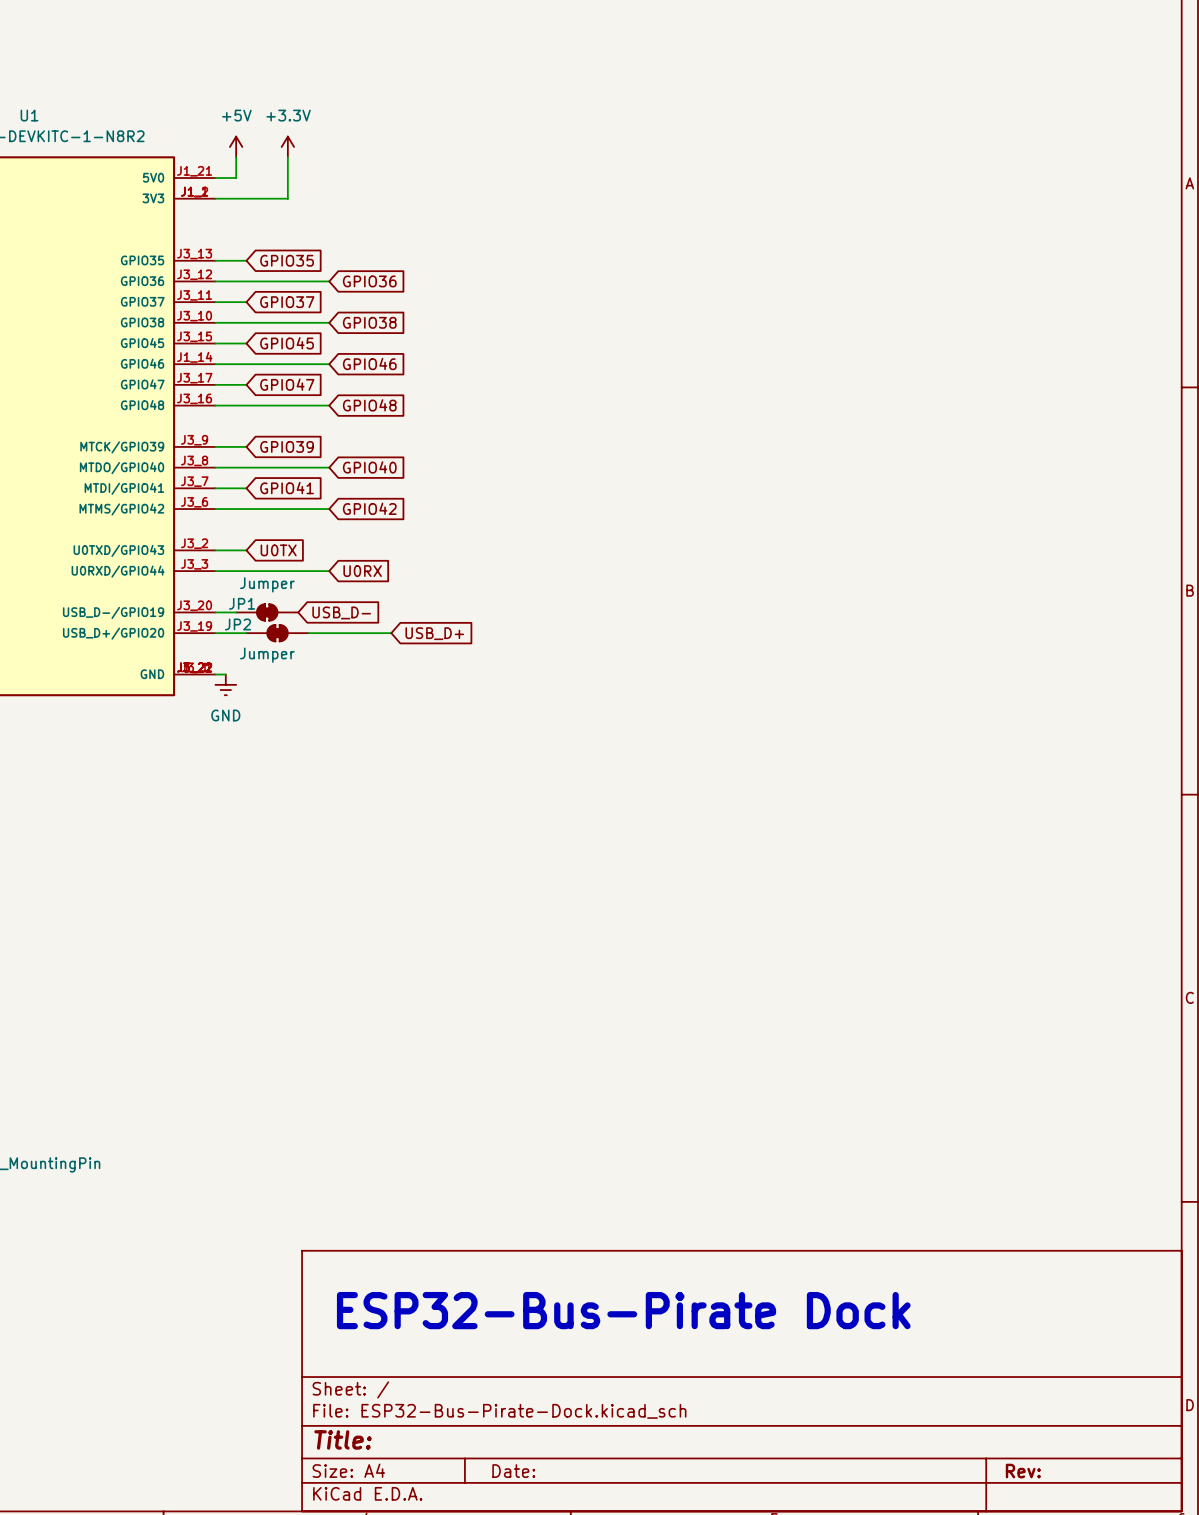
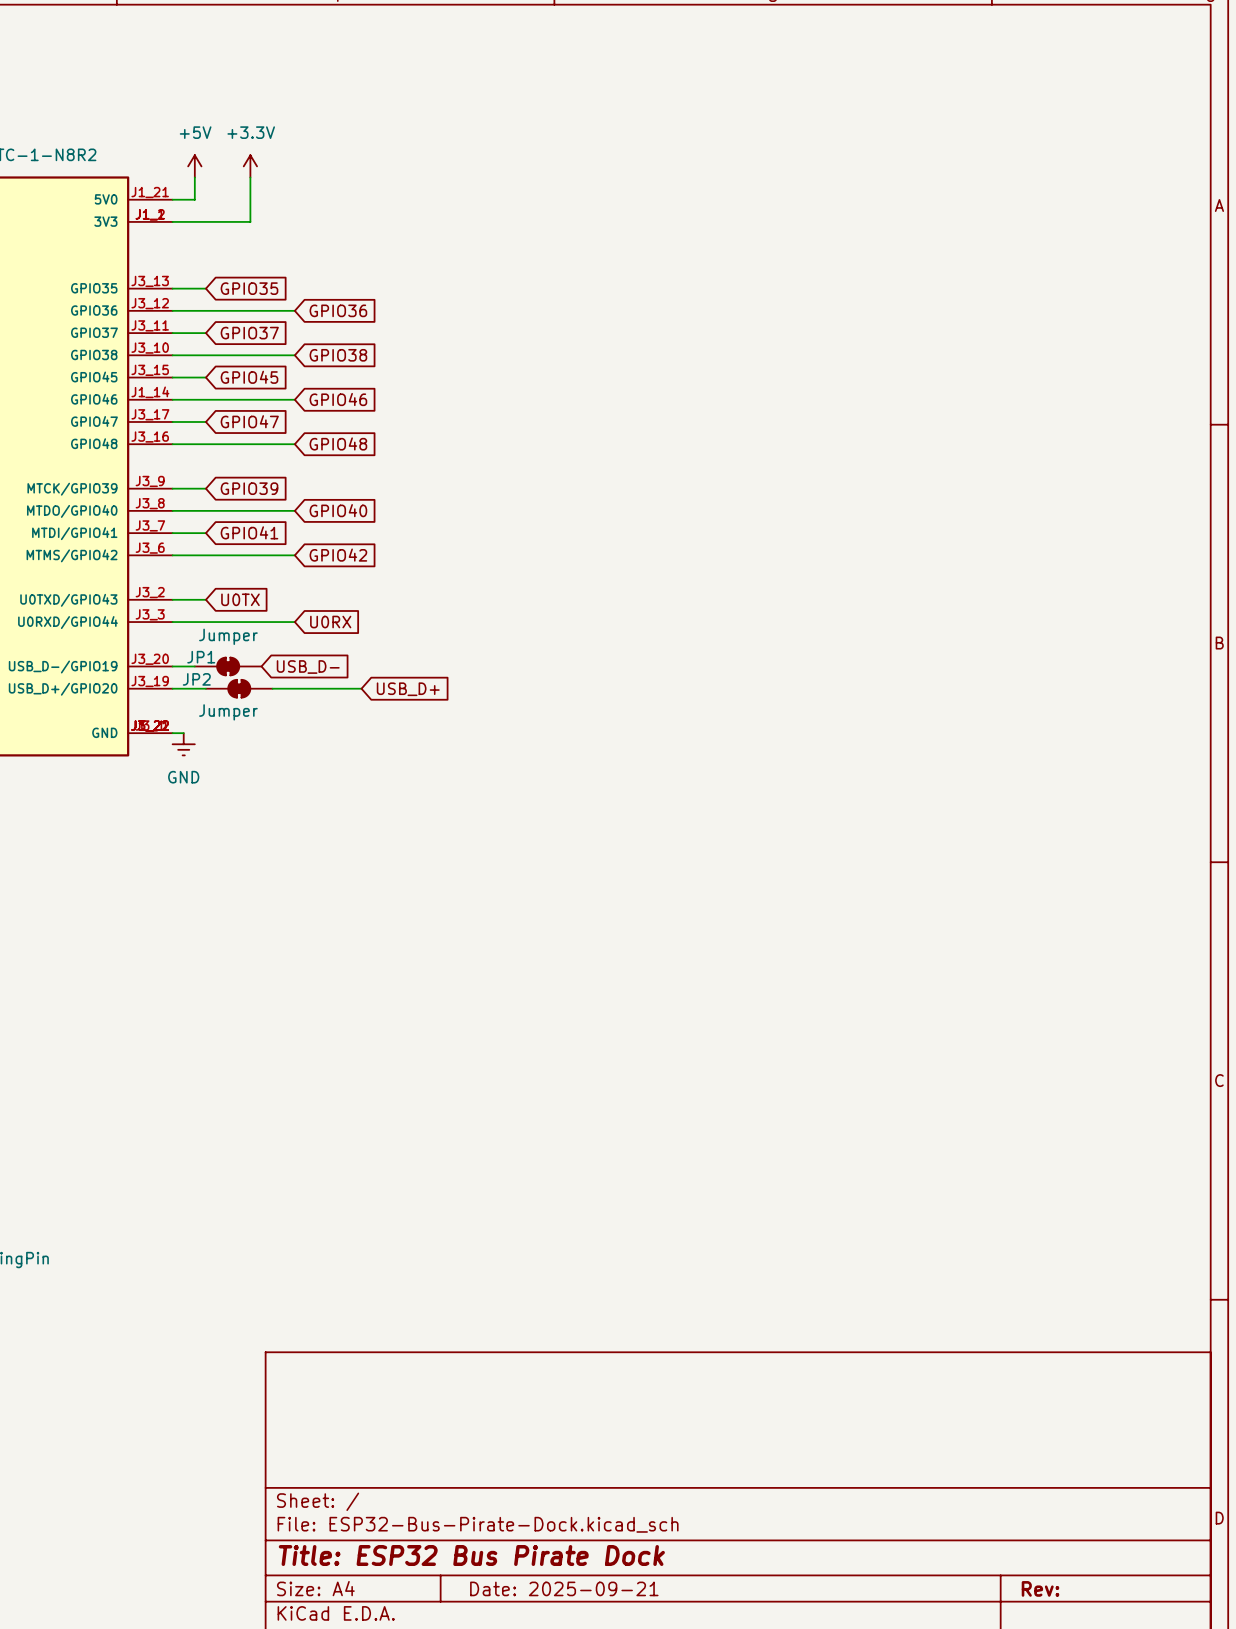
text: ESP32-Bus-Pirate Dock (623, 1310) -> none
title block: Title: (343, 1439) -> Title: ESP32 Bus Pirate Dock (471, 1555)
title block: Date: (513, 1471) -> Date: 2025-09-21 (564, 1588)

